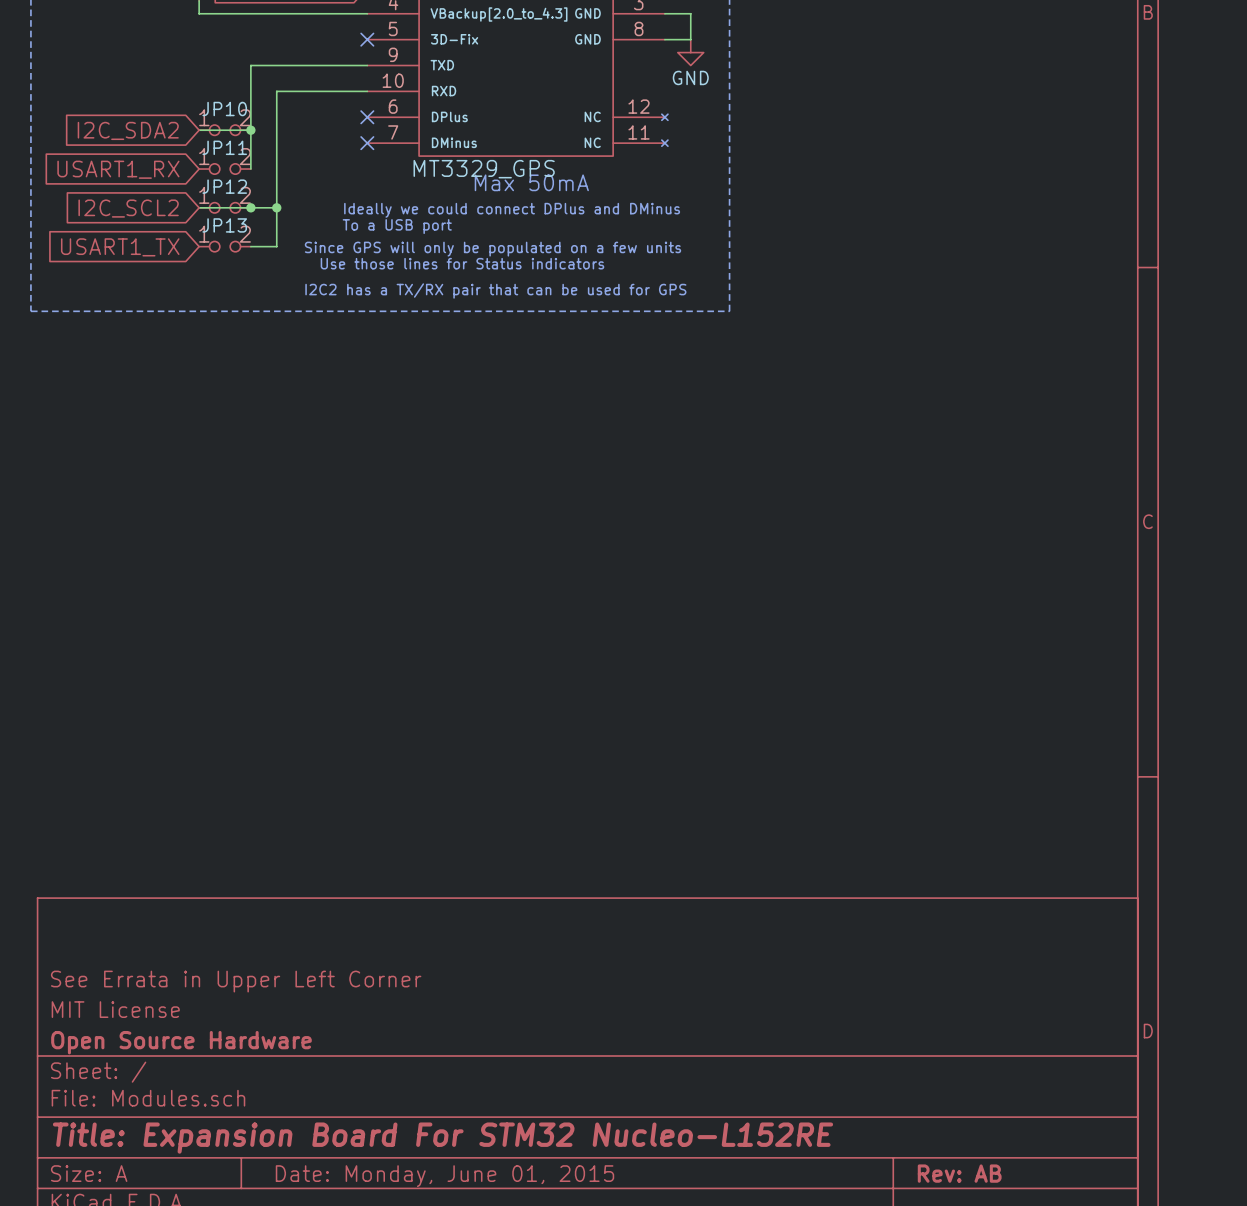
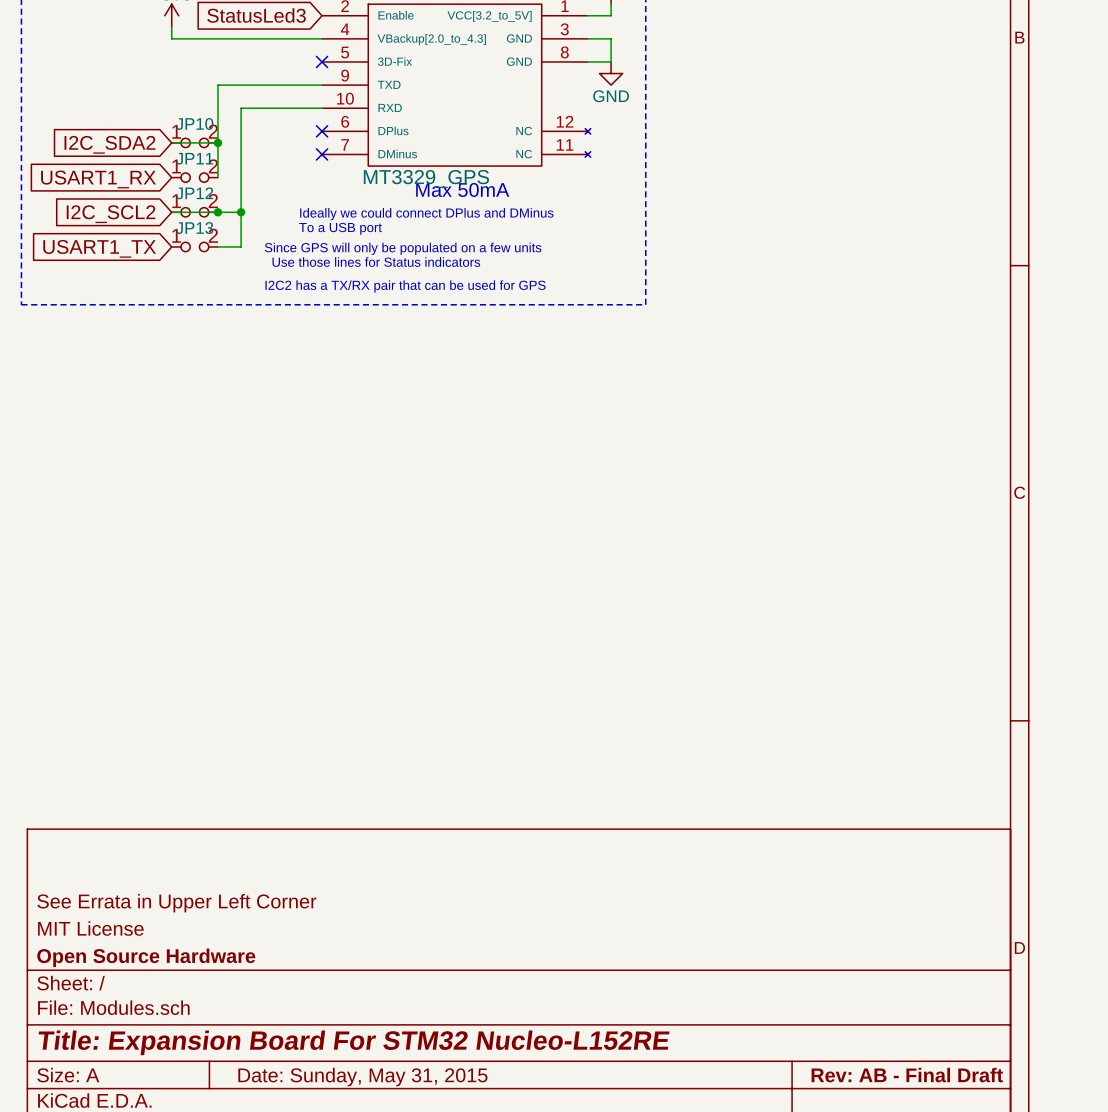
title block: Rev: AB (959, 1173) -> Rev: AB - Final Draft (907, 1075)
title block: Date: Monday, June 01, 2015 (444, 1176) -> Date: Sunday, May 31, 2015 (362, 1077)

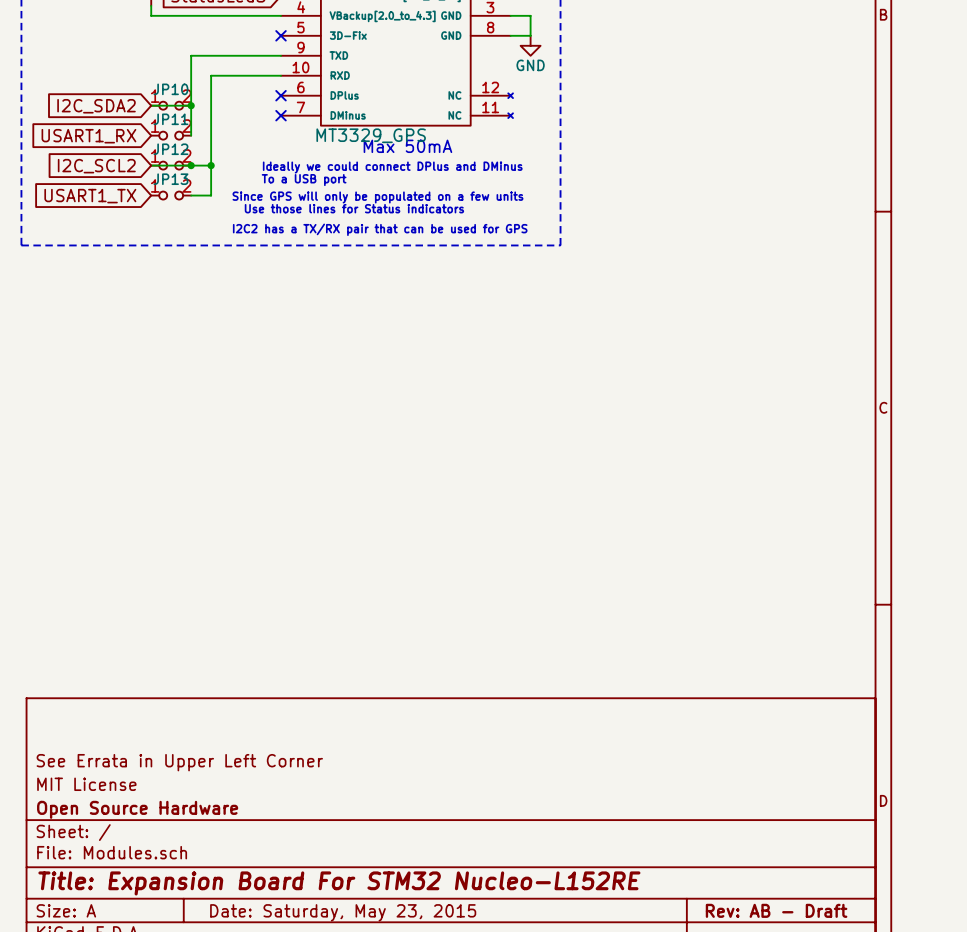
title block: Rev: AB - Final Draft (907, 1075) -> Rev: AB - Draft (776, 910)
title block: Date: Sunday, May 31, 2015 (362, 1077) -> Date: Saturday, May 23, 2015 (343, 912)

